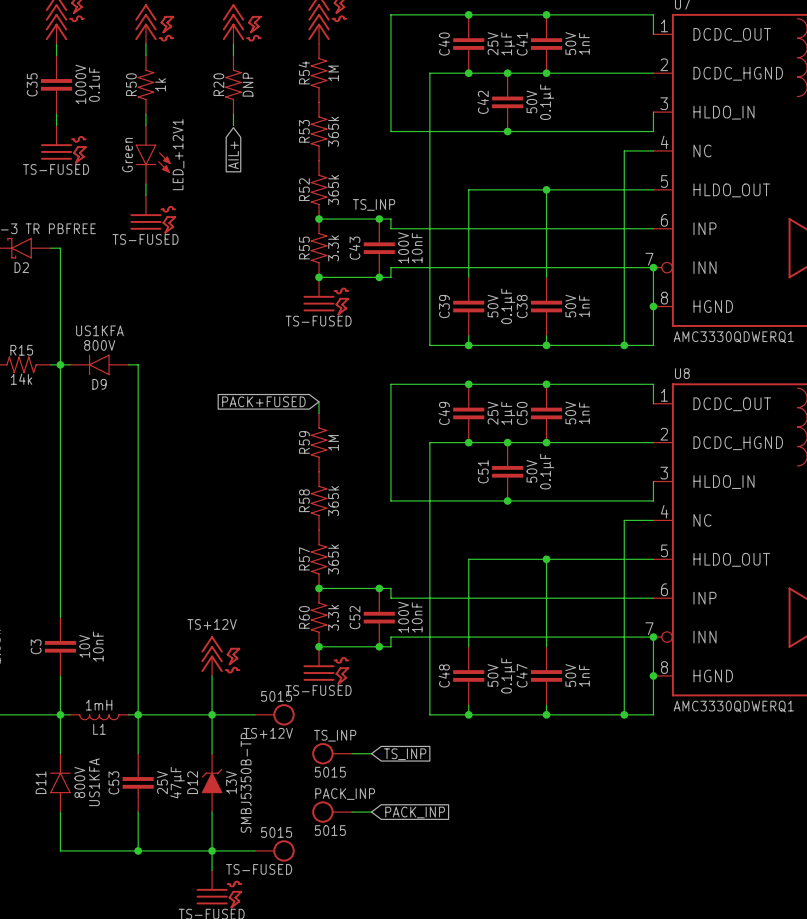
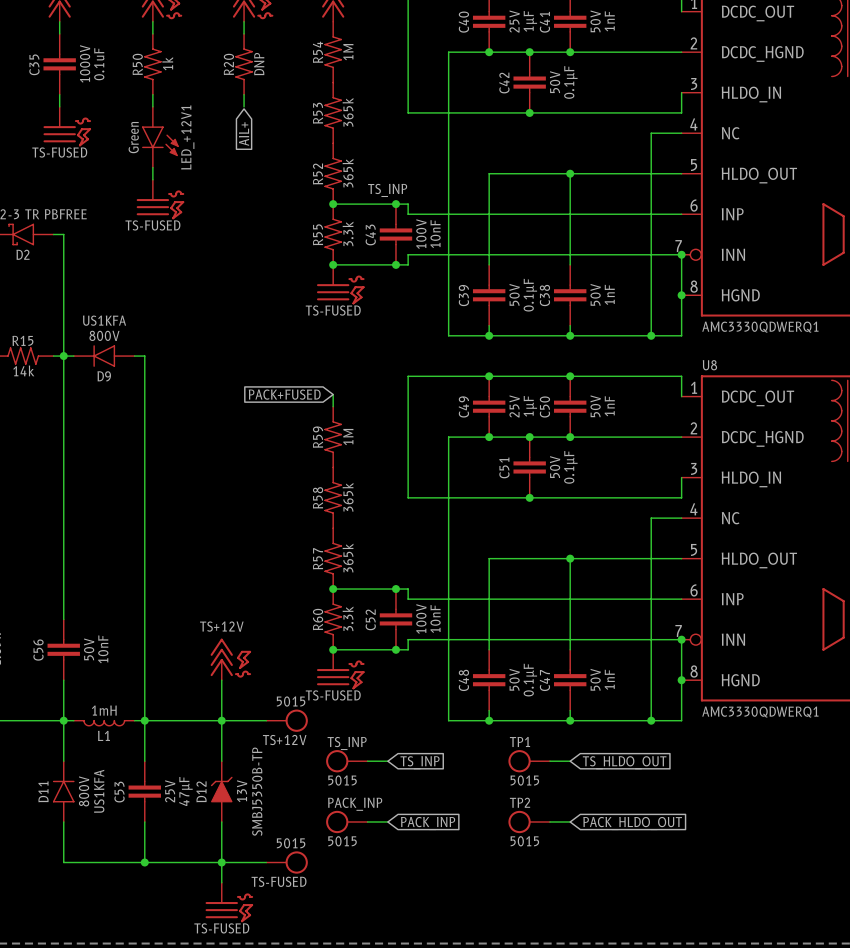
C3 name: C3 (36, 646) -> C56 (38, 650)
C3 text: 10V (84, 646) -> 50V (89, 649)
TP1: none -> (529, 761)
wire: none -> (549, 761) (570, 761)
global label: none -> TS_HLDO_OUT (624, 762)
TP2: none -> (529, 821)
wire: none -> (549, 821) (570, 821)
global label: none -> PACK_HLDO_OUT (632, 823)

